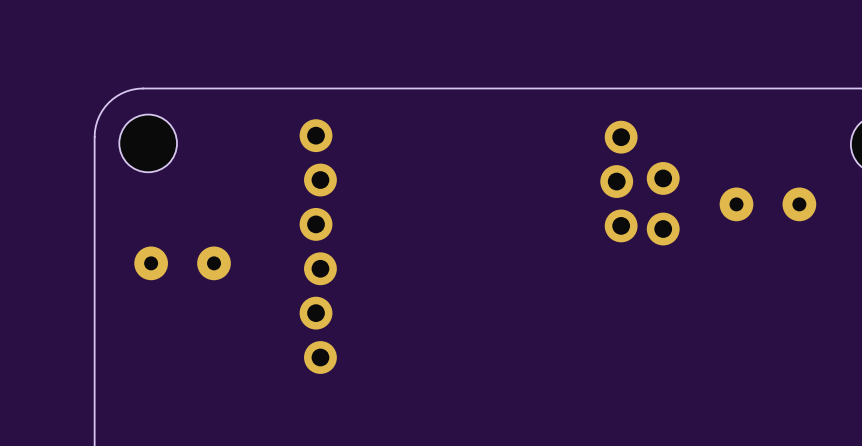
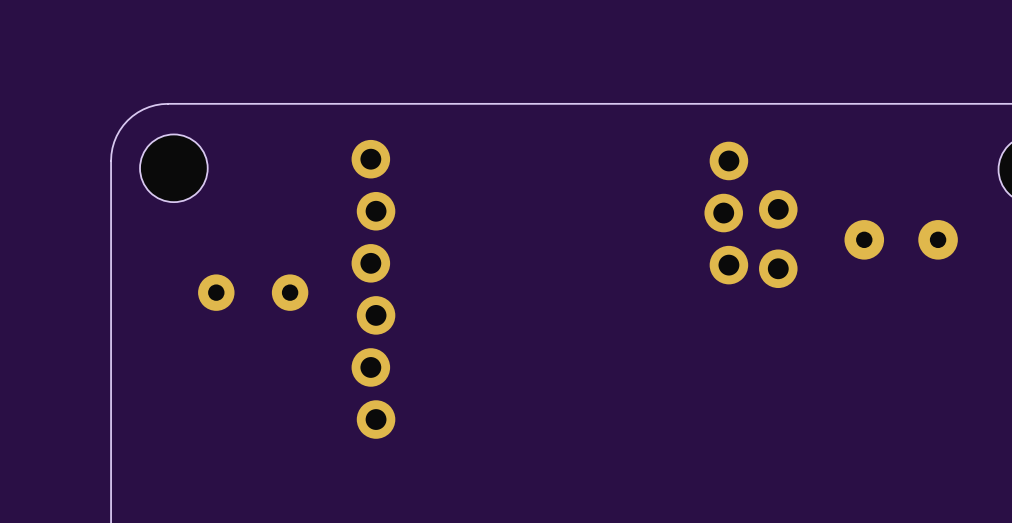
part: none -> (253, 292)
part: (182, 263) -> none

